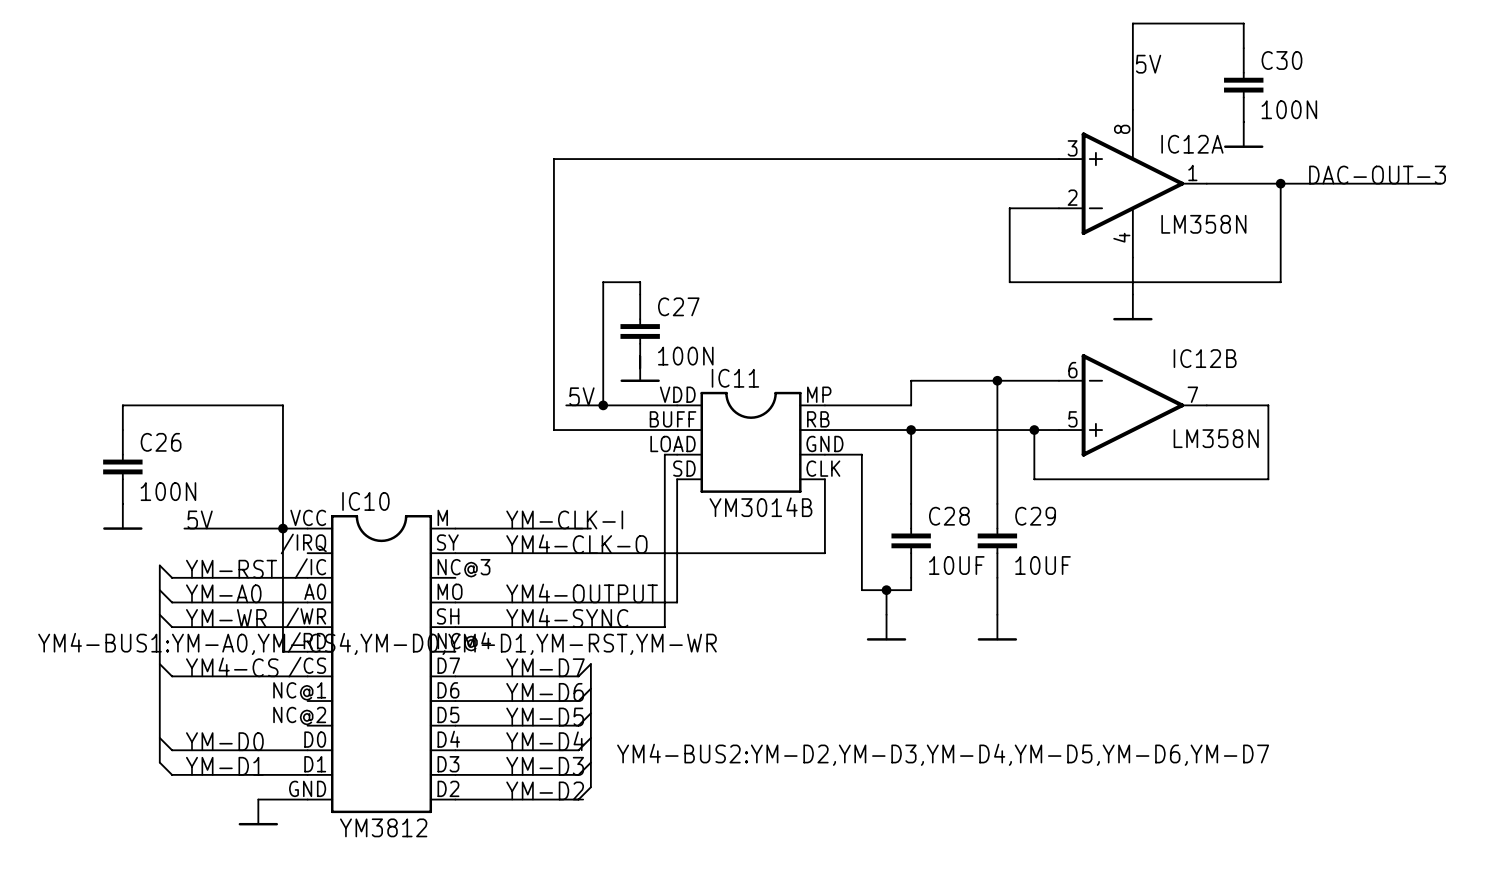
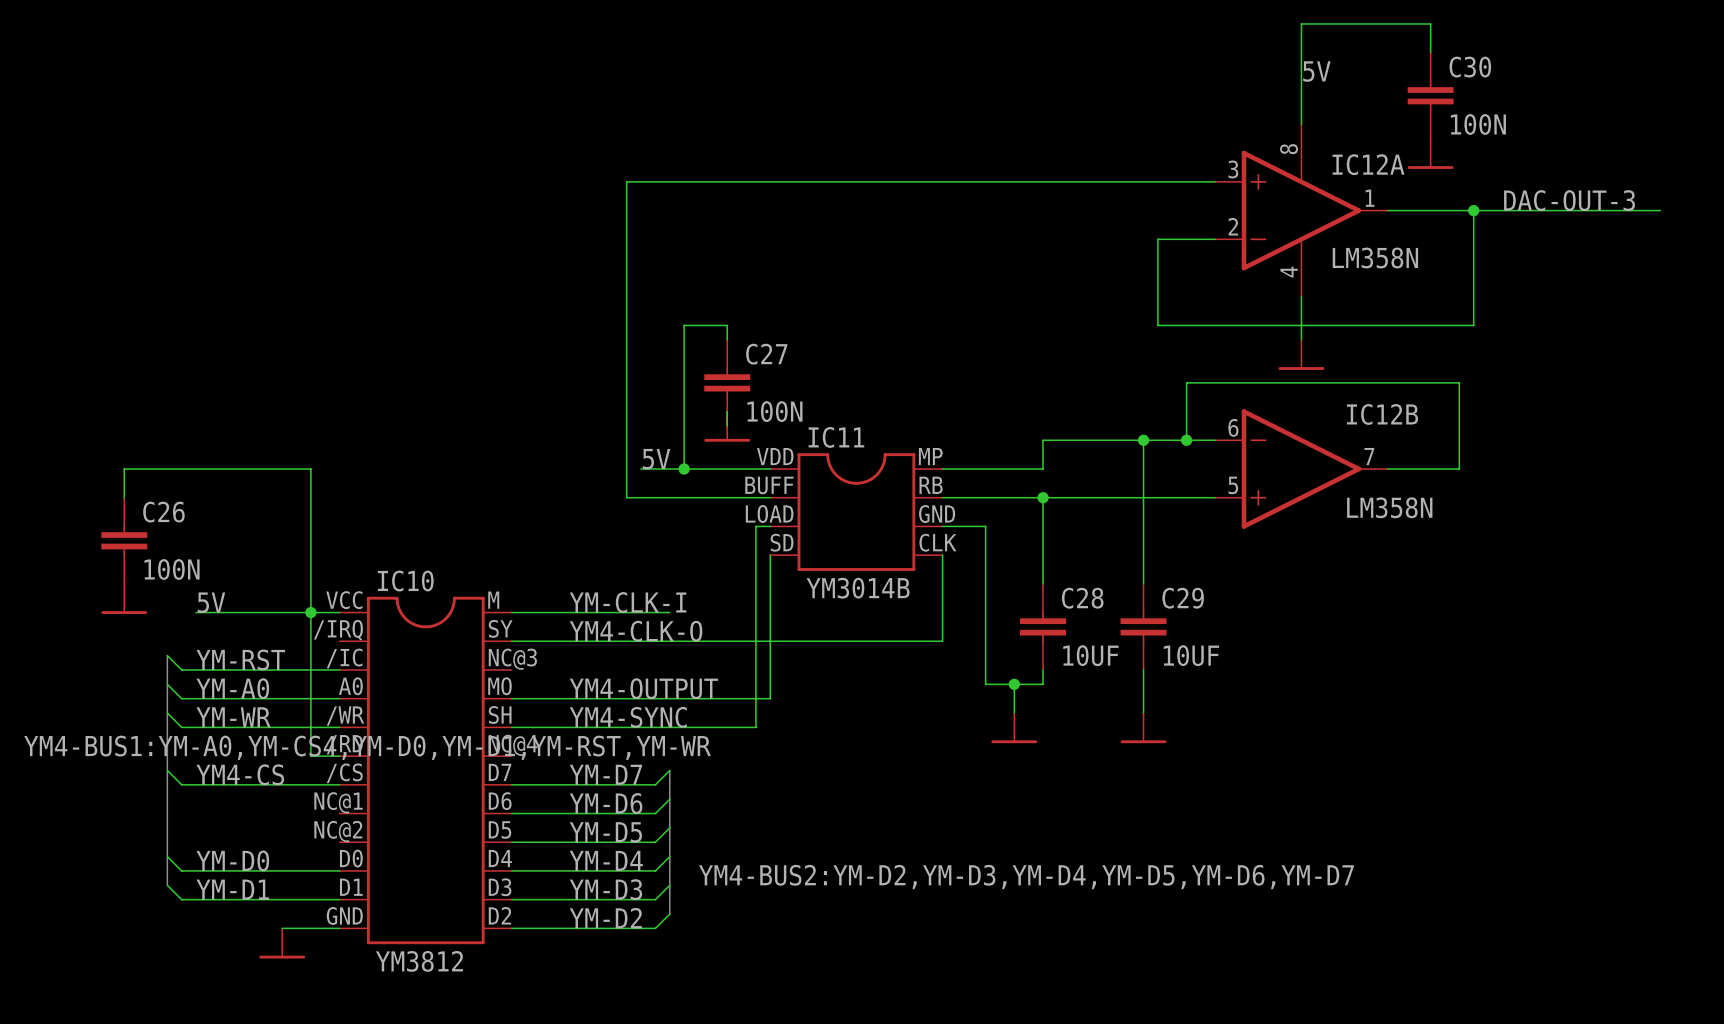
wire: (1268, 405) (1268, 479) (1034, 479) (1034, 430) -> (1459, 469) (1459, 382) (1186, 382) (1186, 440)
junction position: (1034, 430) -> (1186, 440)

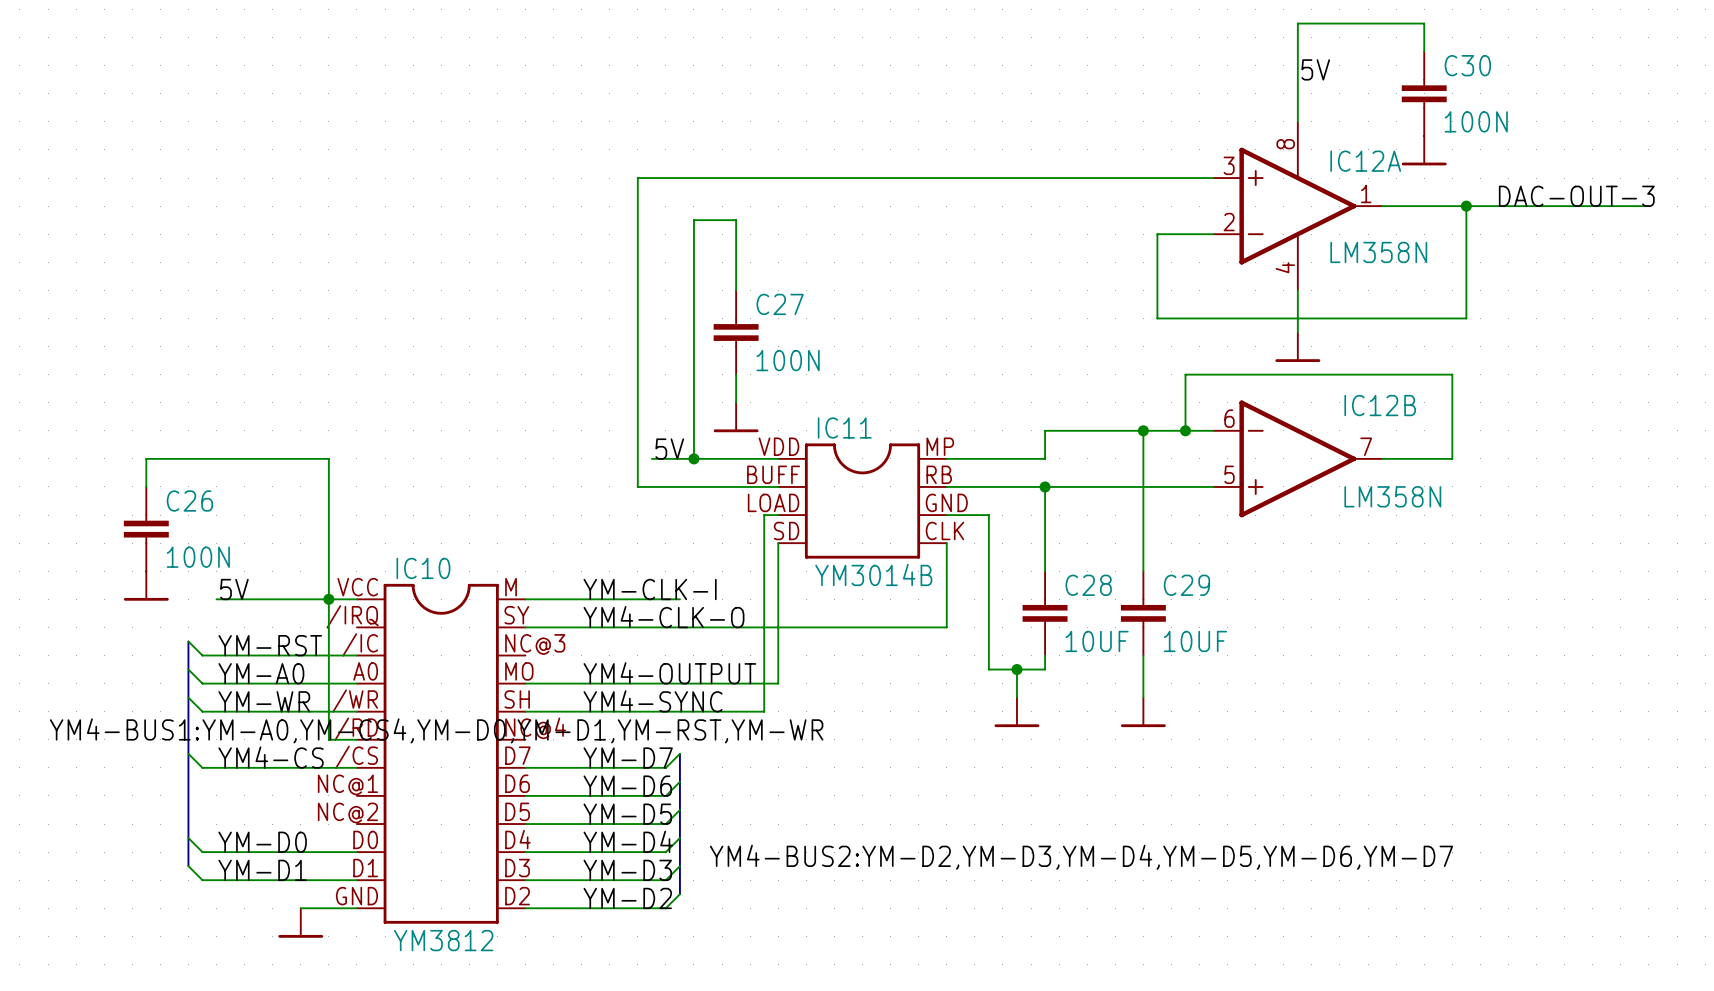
wire: (684, 325) (727, 325) (727, 339) -> (693, 318) (693, 220) (736, 220) (736, 290)
C27 position: (727, 382) -> (736, 332)

